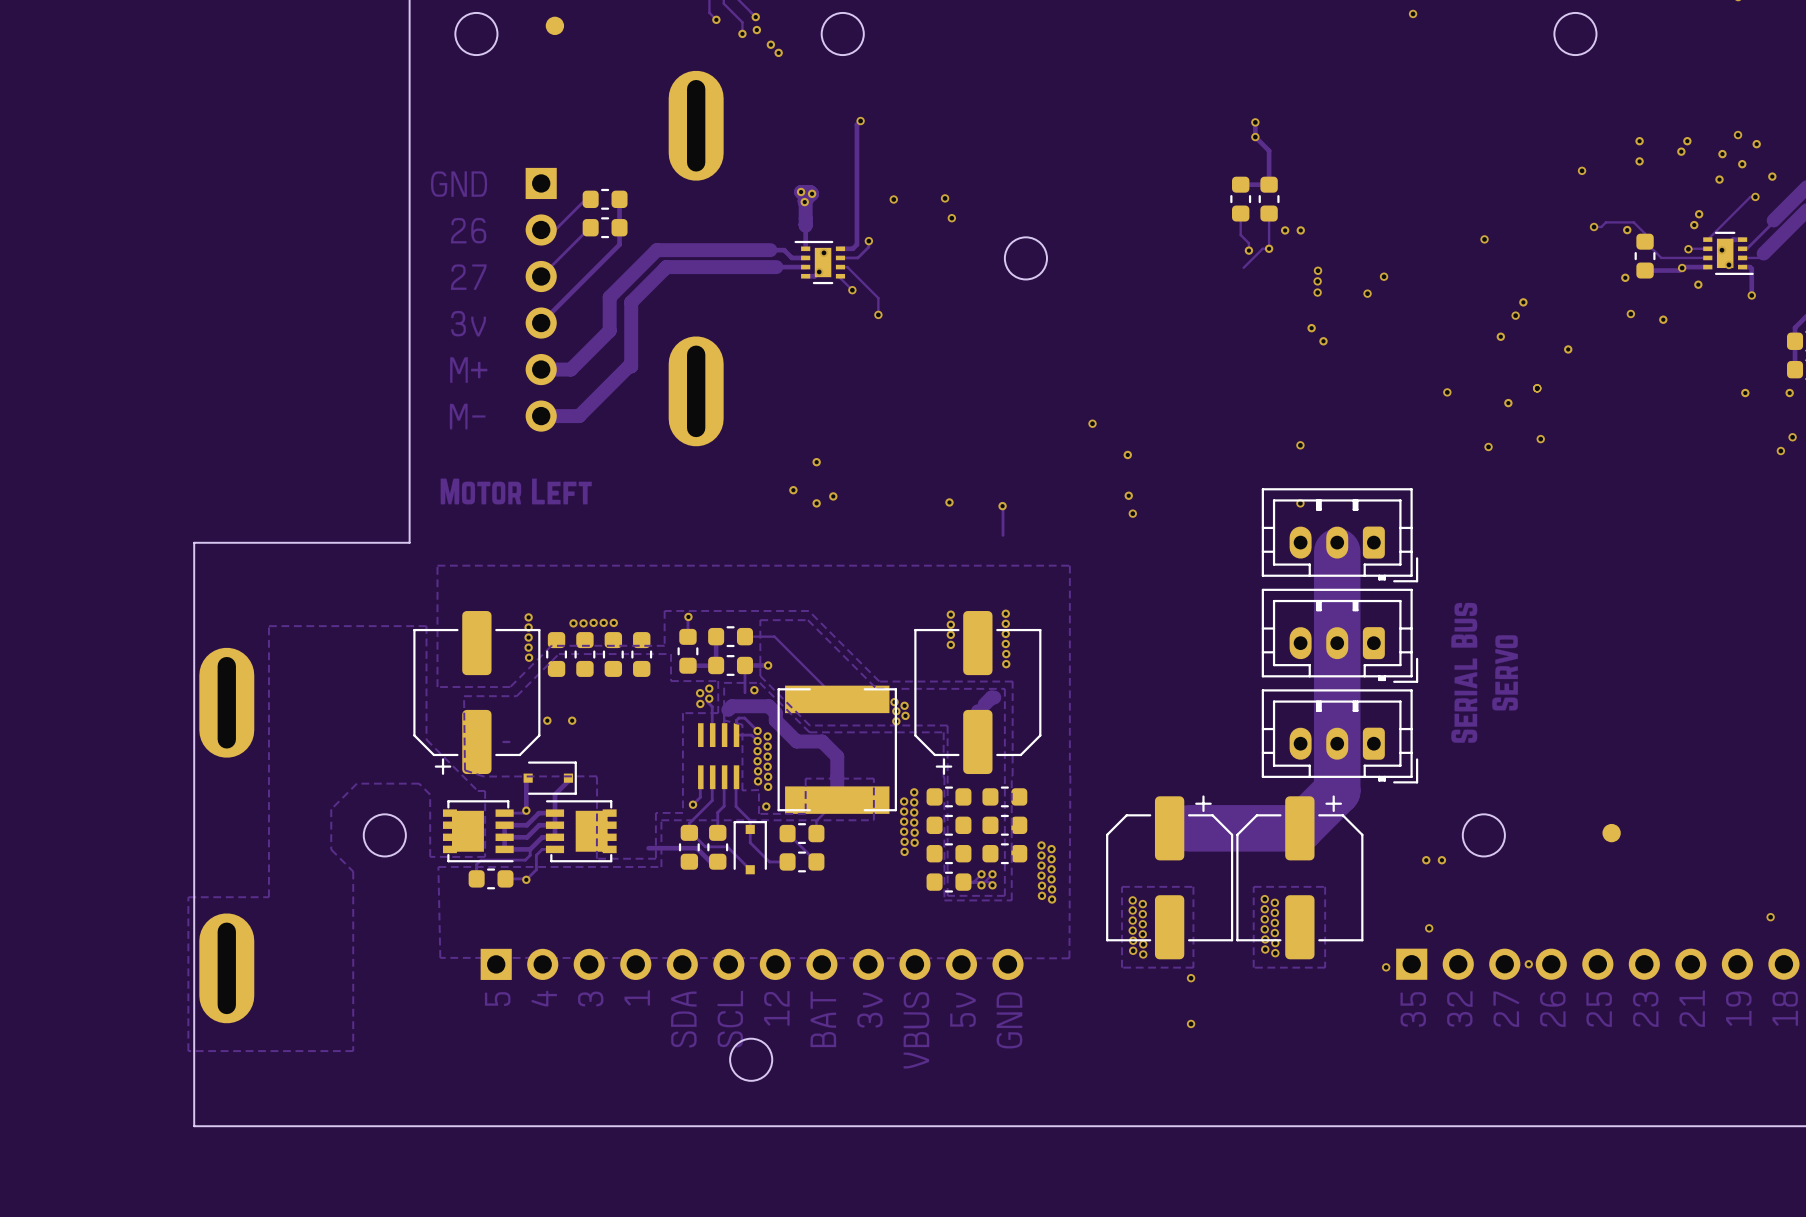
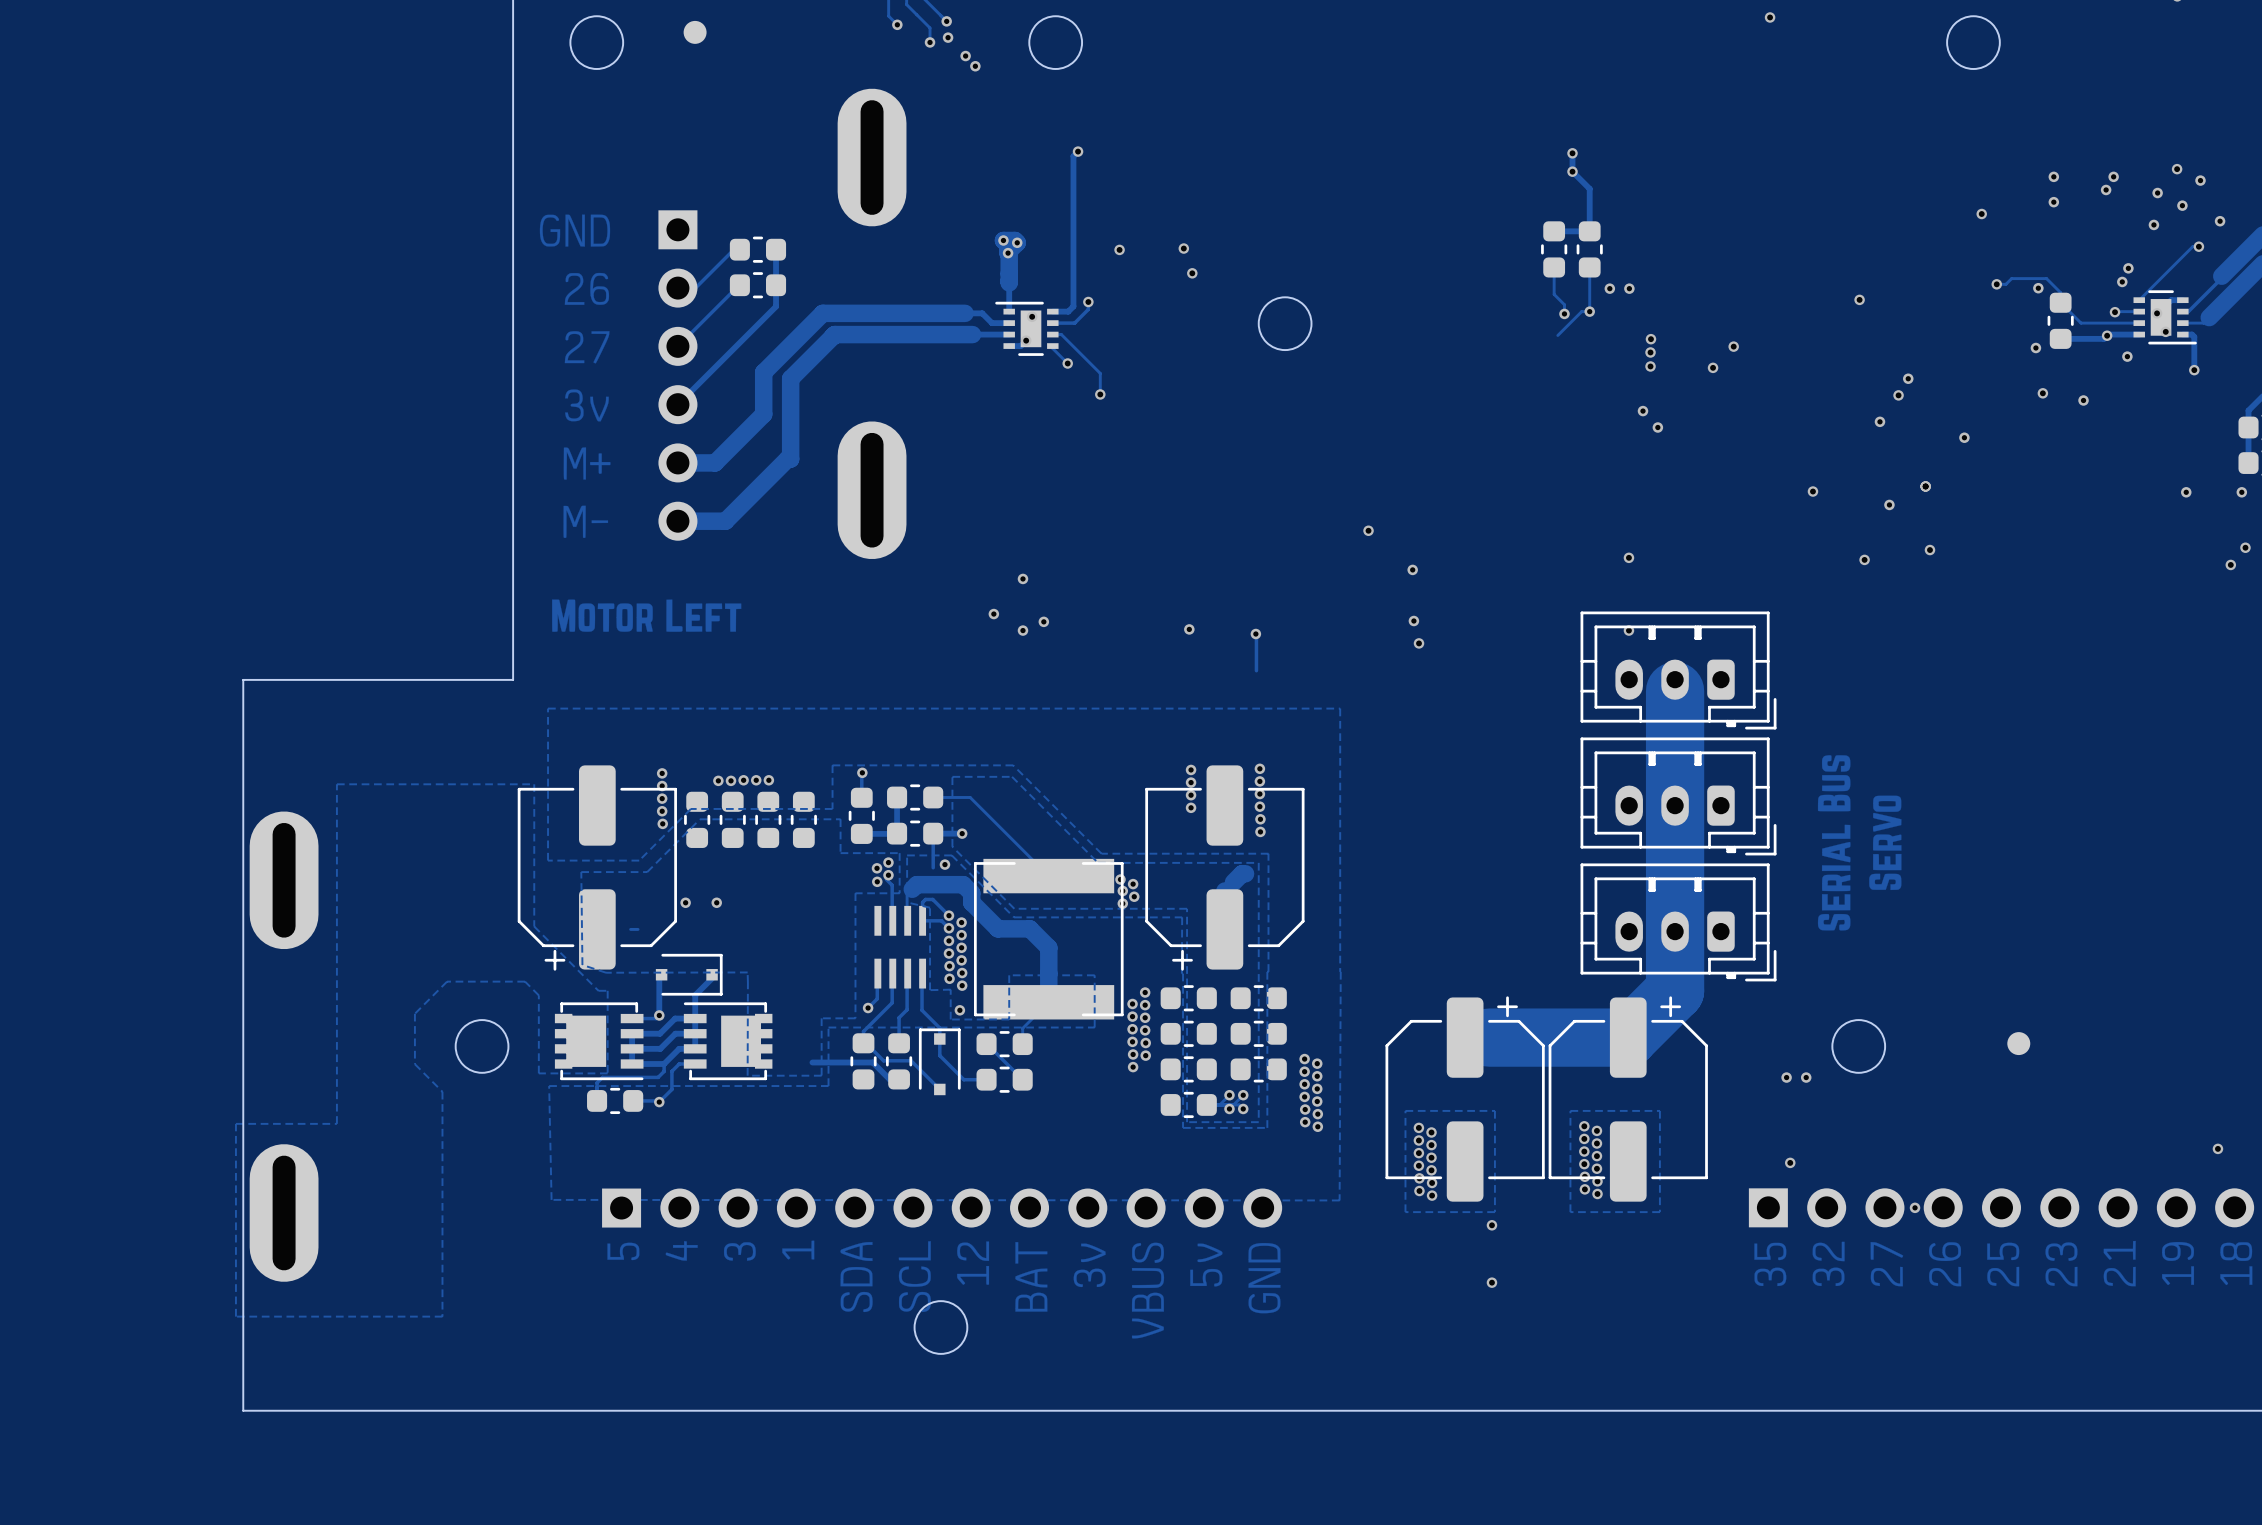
via: (1386, 967) -> none

